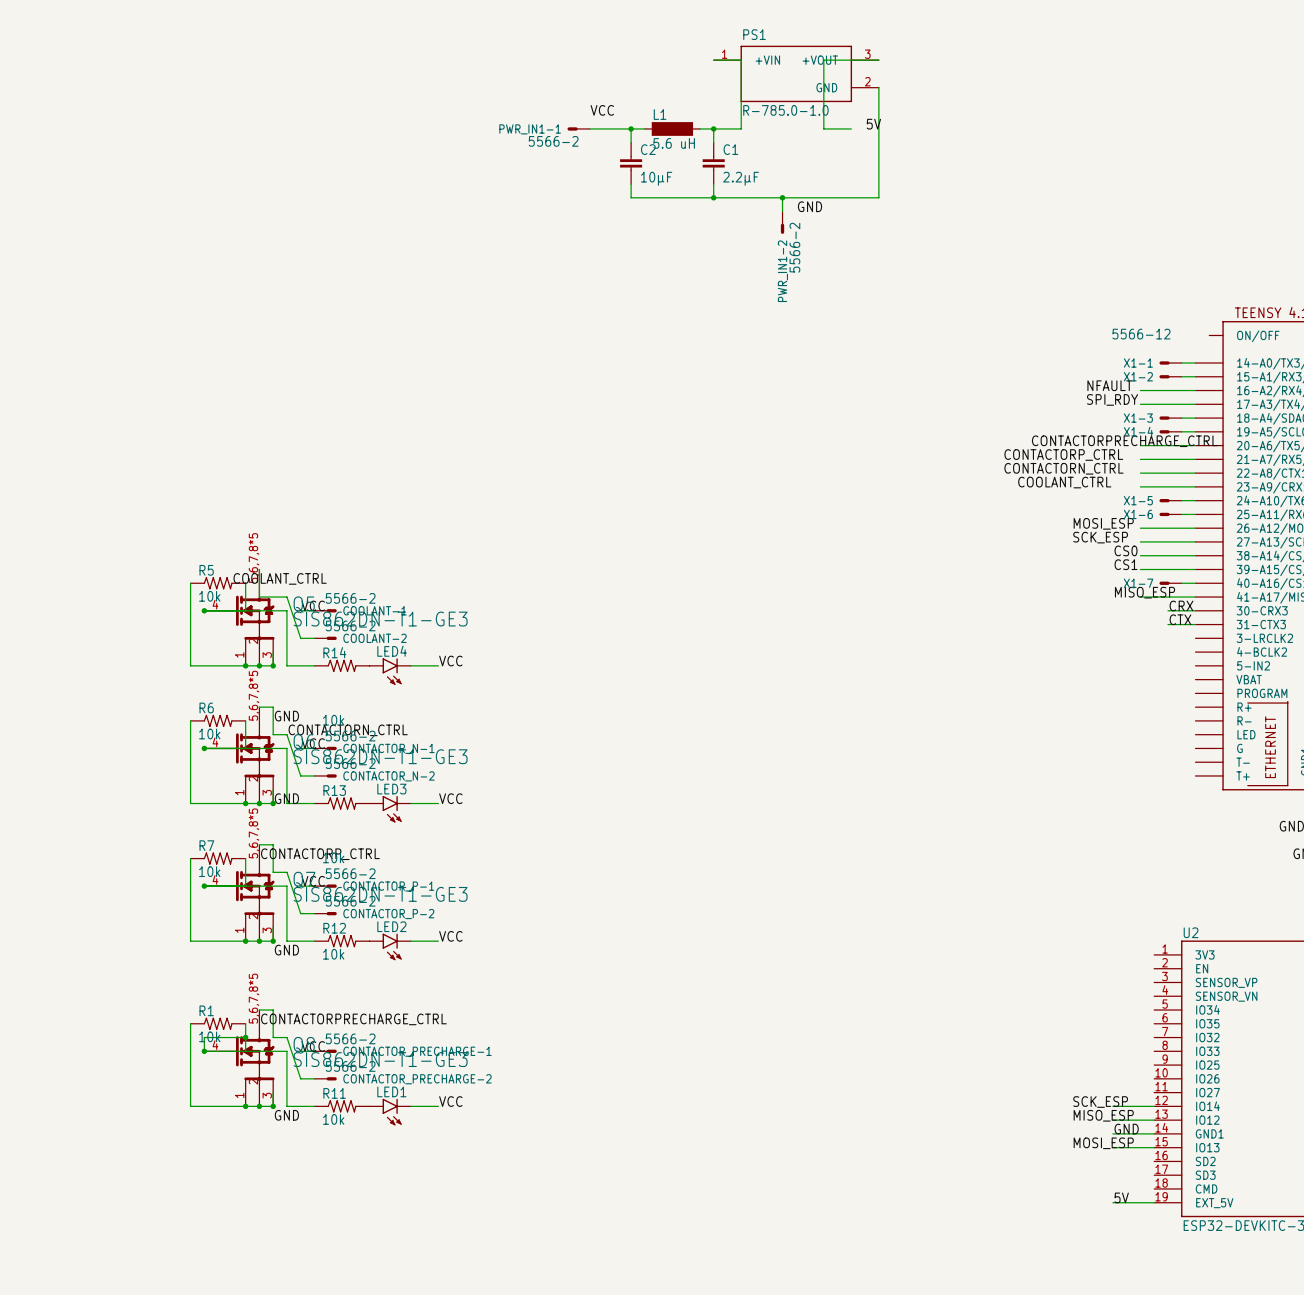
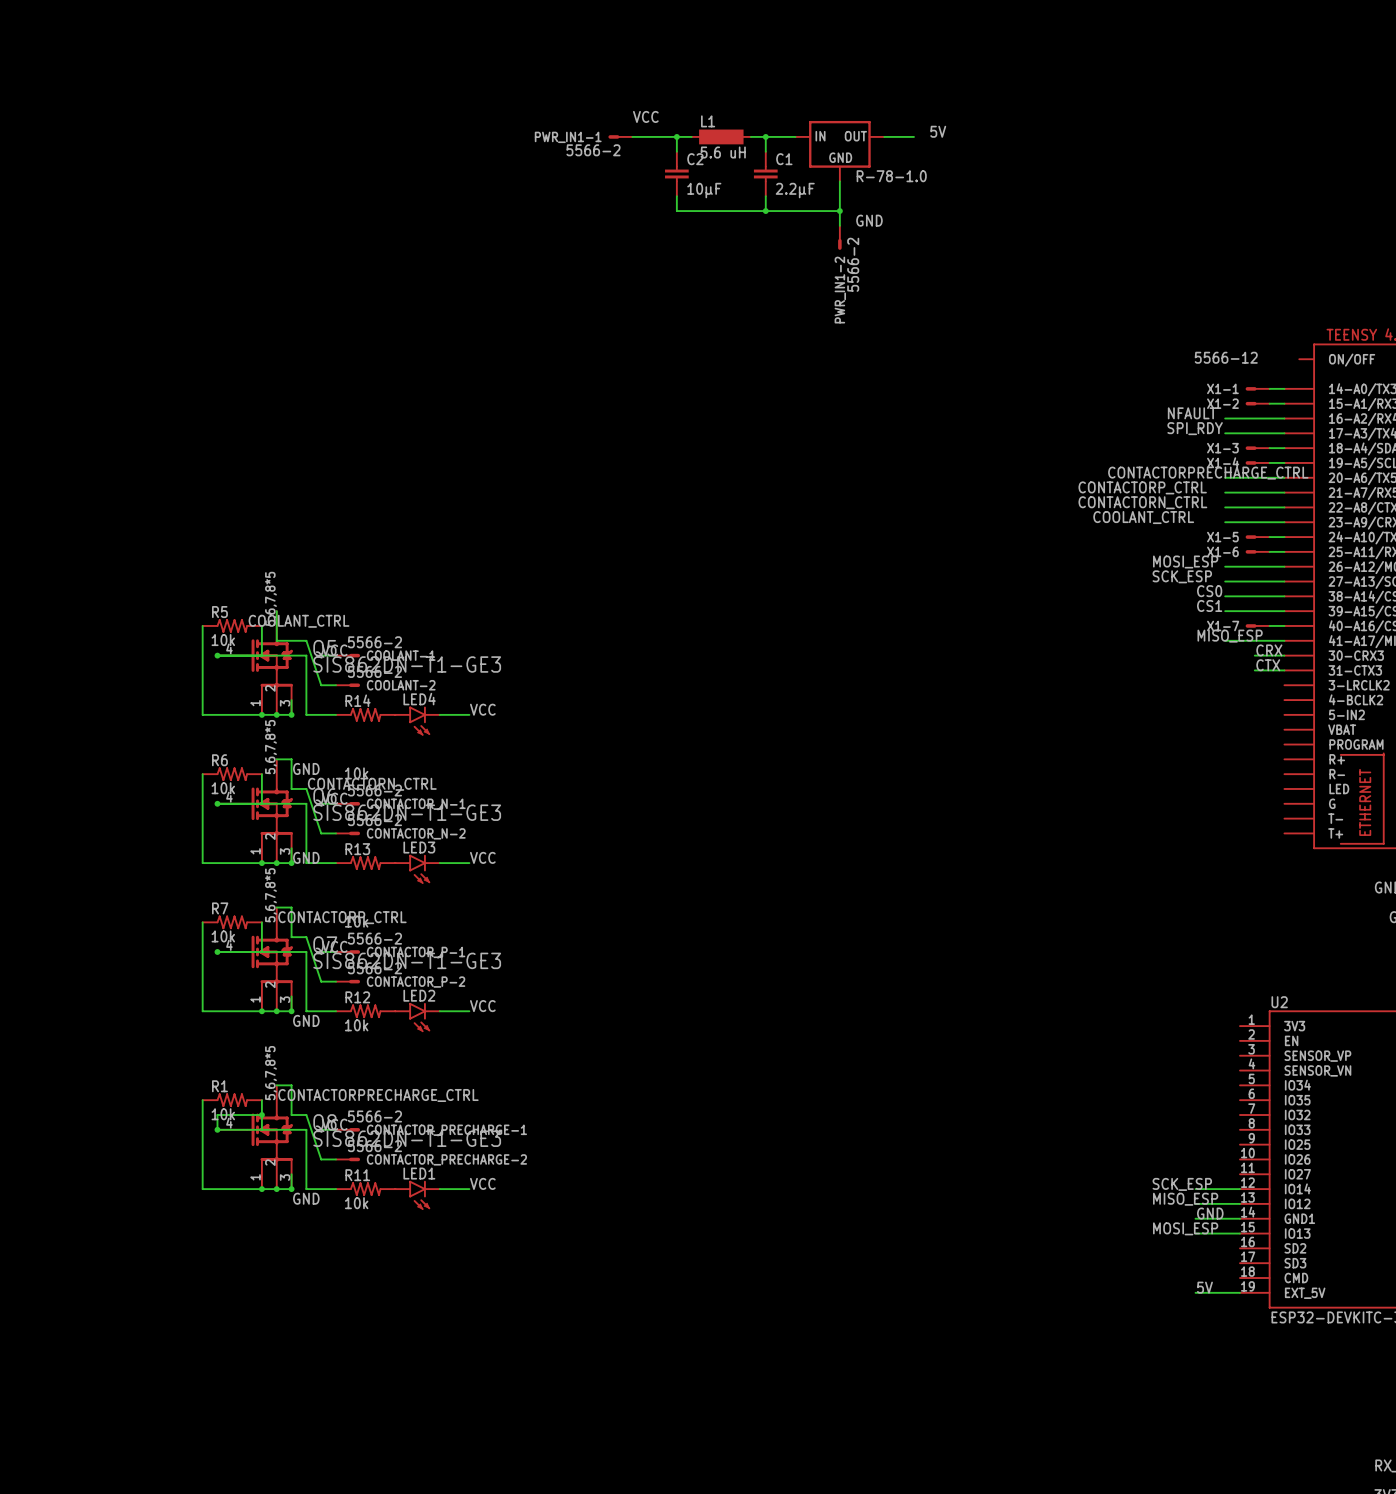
wire: (713, 60) (741, 60) (741, 128) -> none
wire: (878, 60) (823, 60) (823, 128) -> none
PS1: R-785.0-1.0 (796, 73) -> none
wire: (878, 87) (878, 197) (782, 197) -> (839, 181) (839, 211)
R-78-1.0: none -> (839, 151)

